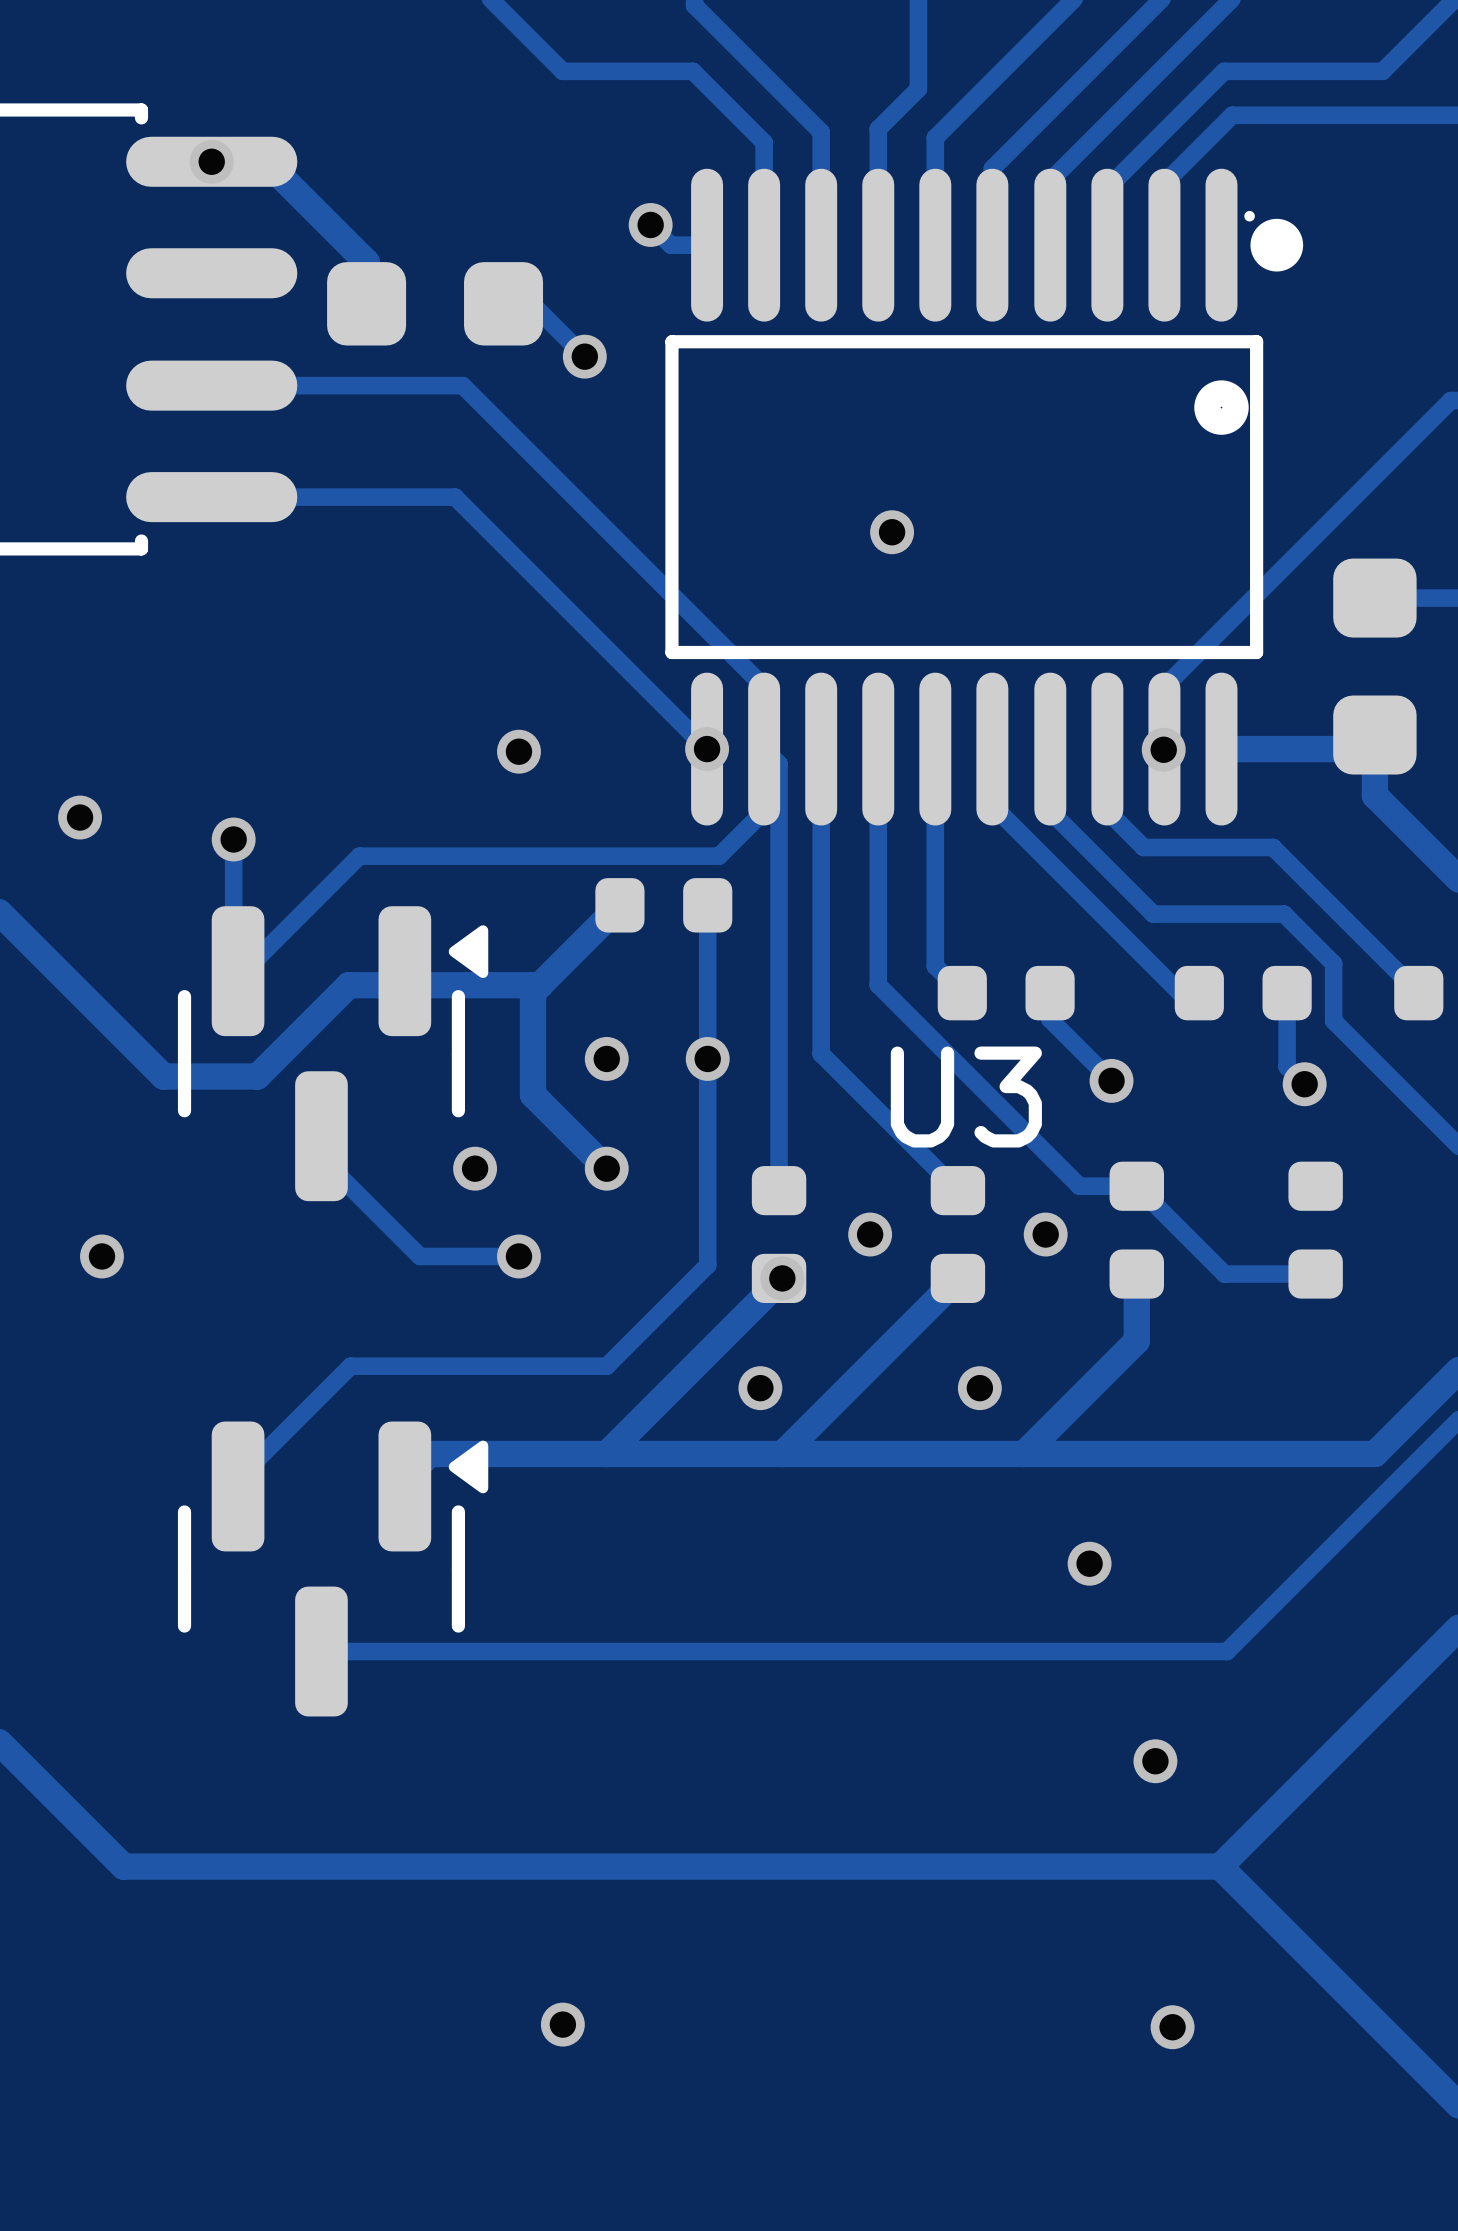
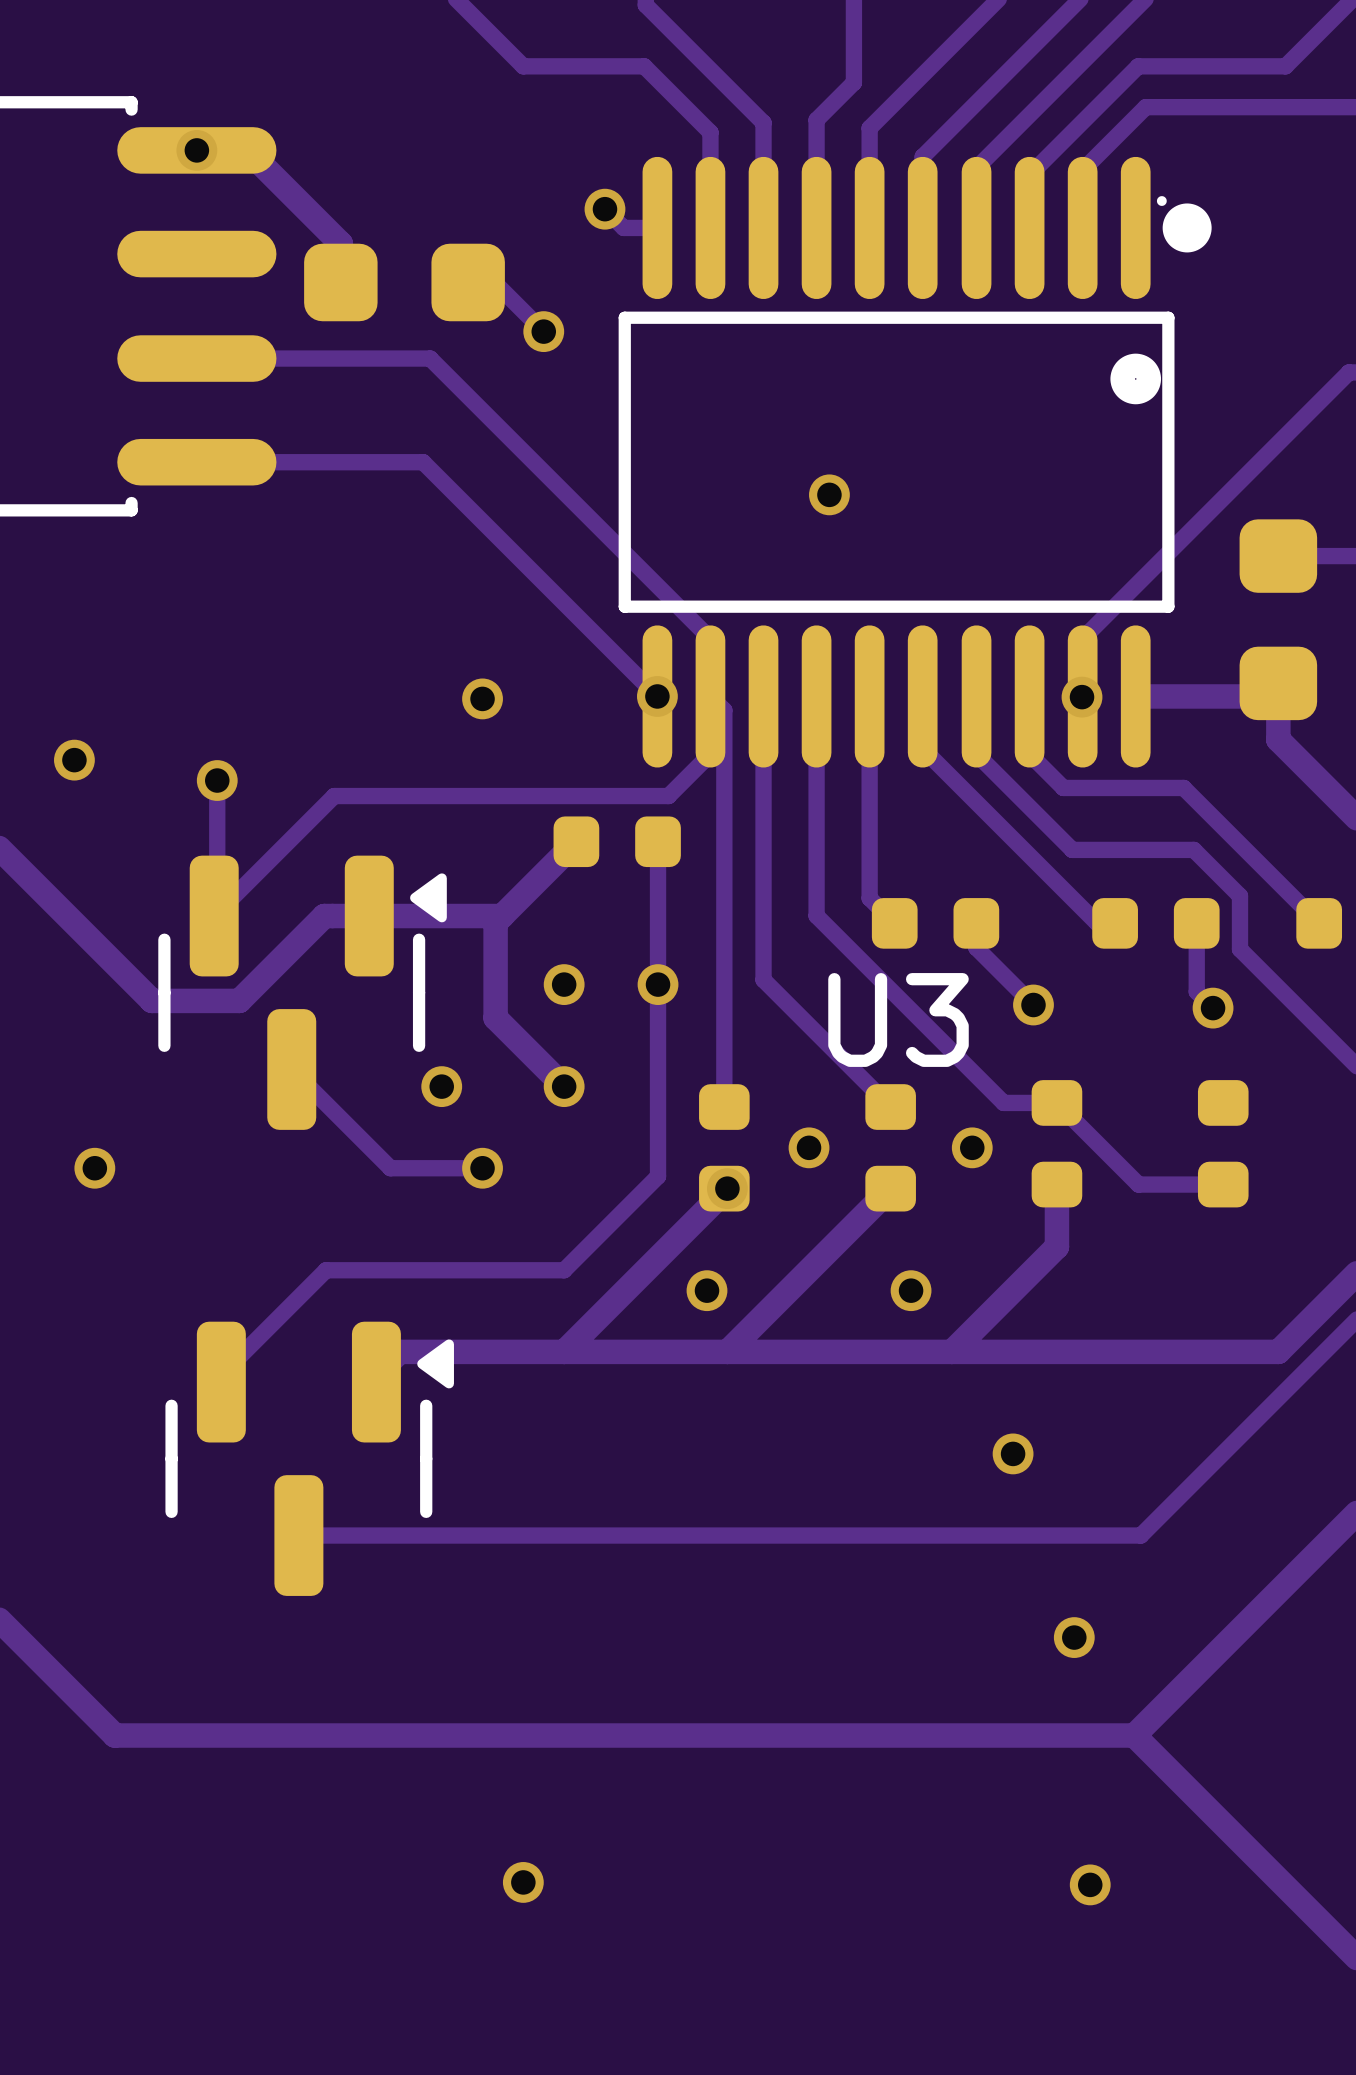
part position: (333, 1053) -> (302, 992)

